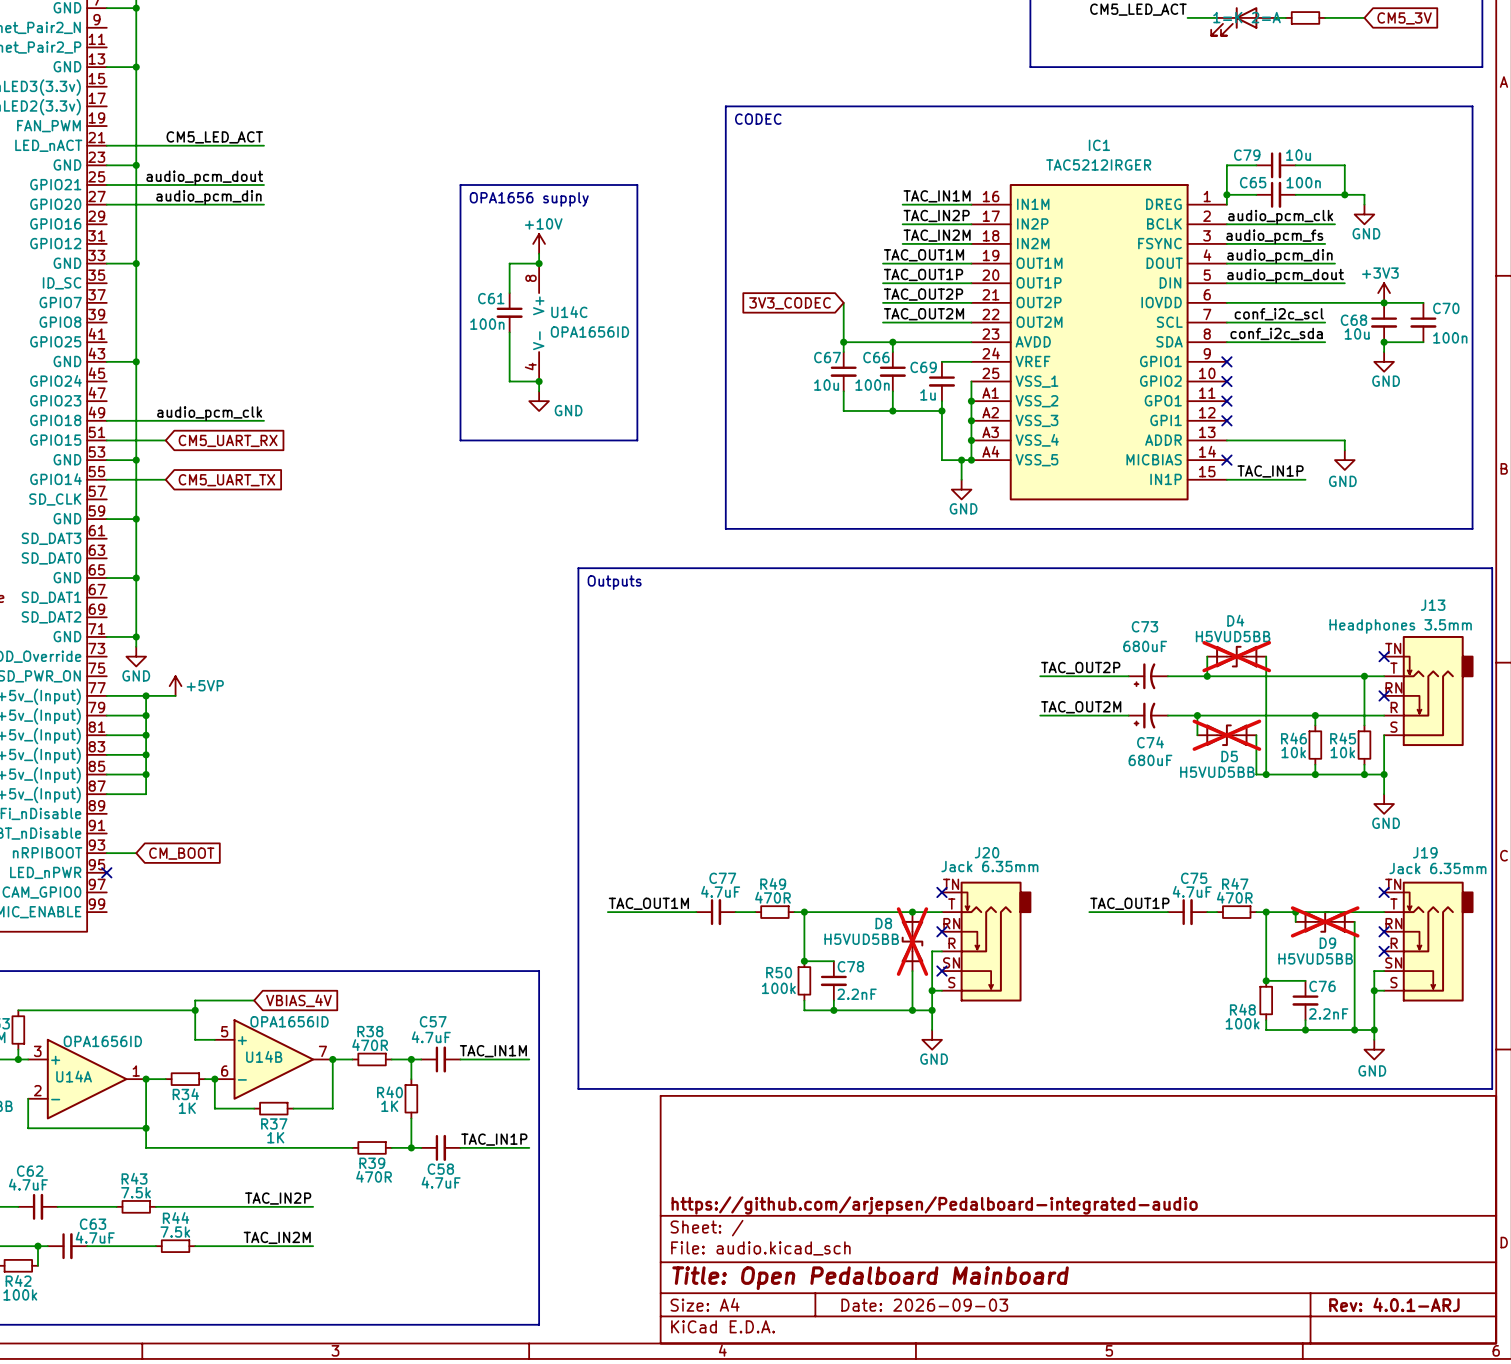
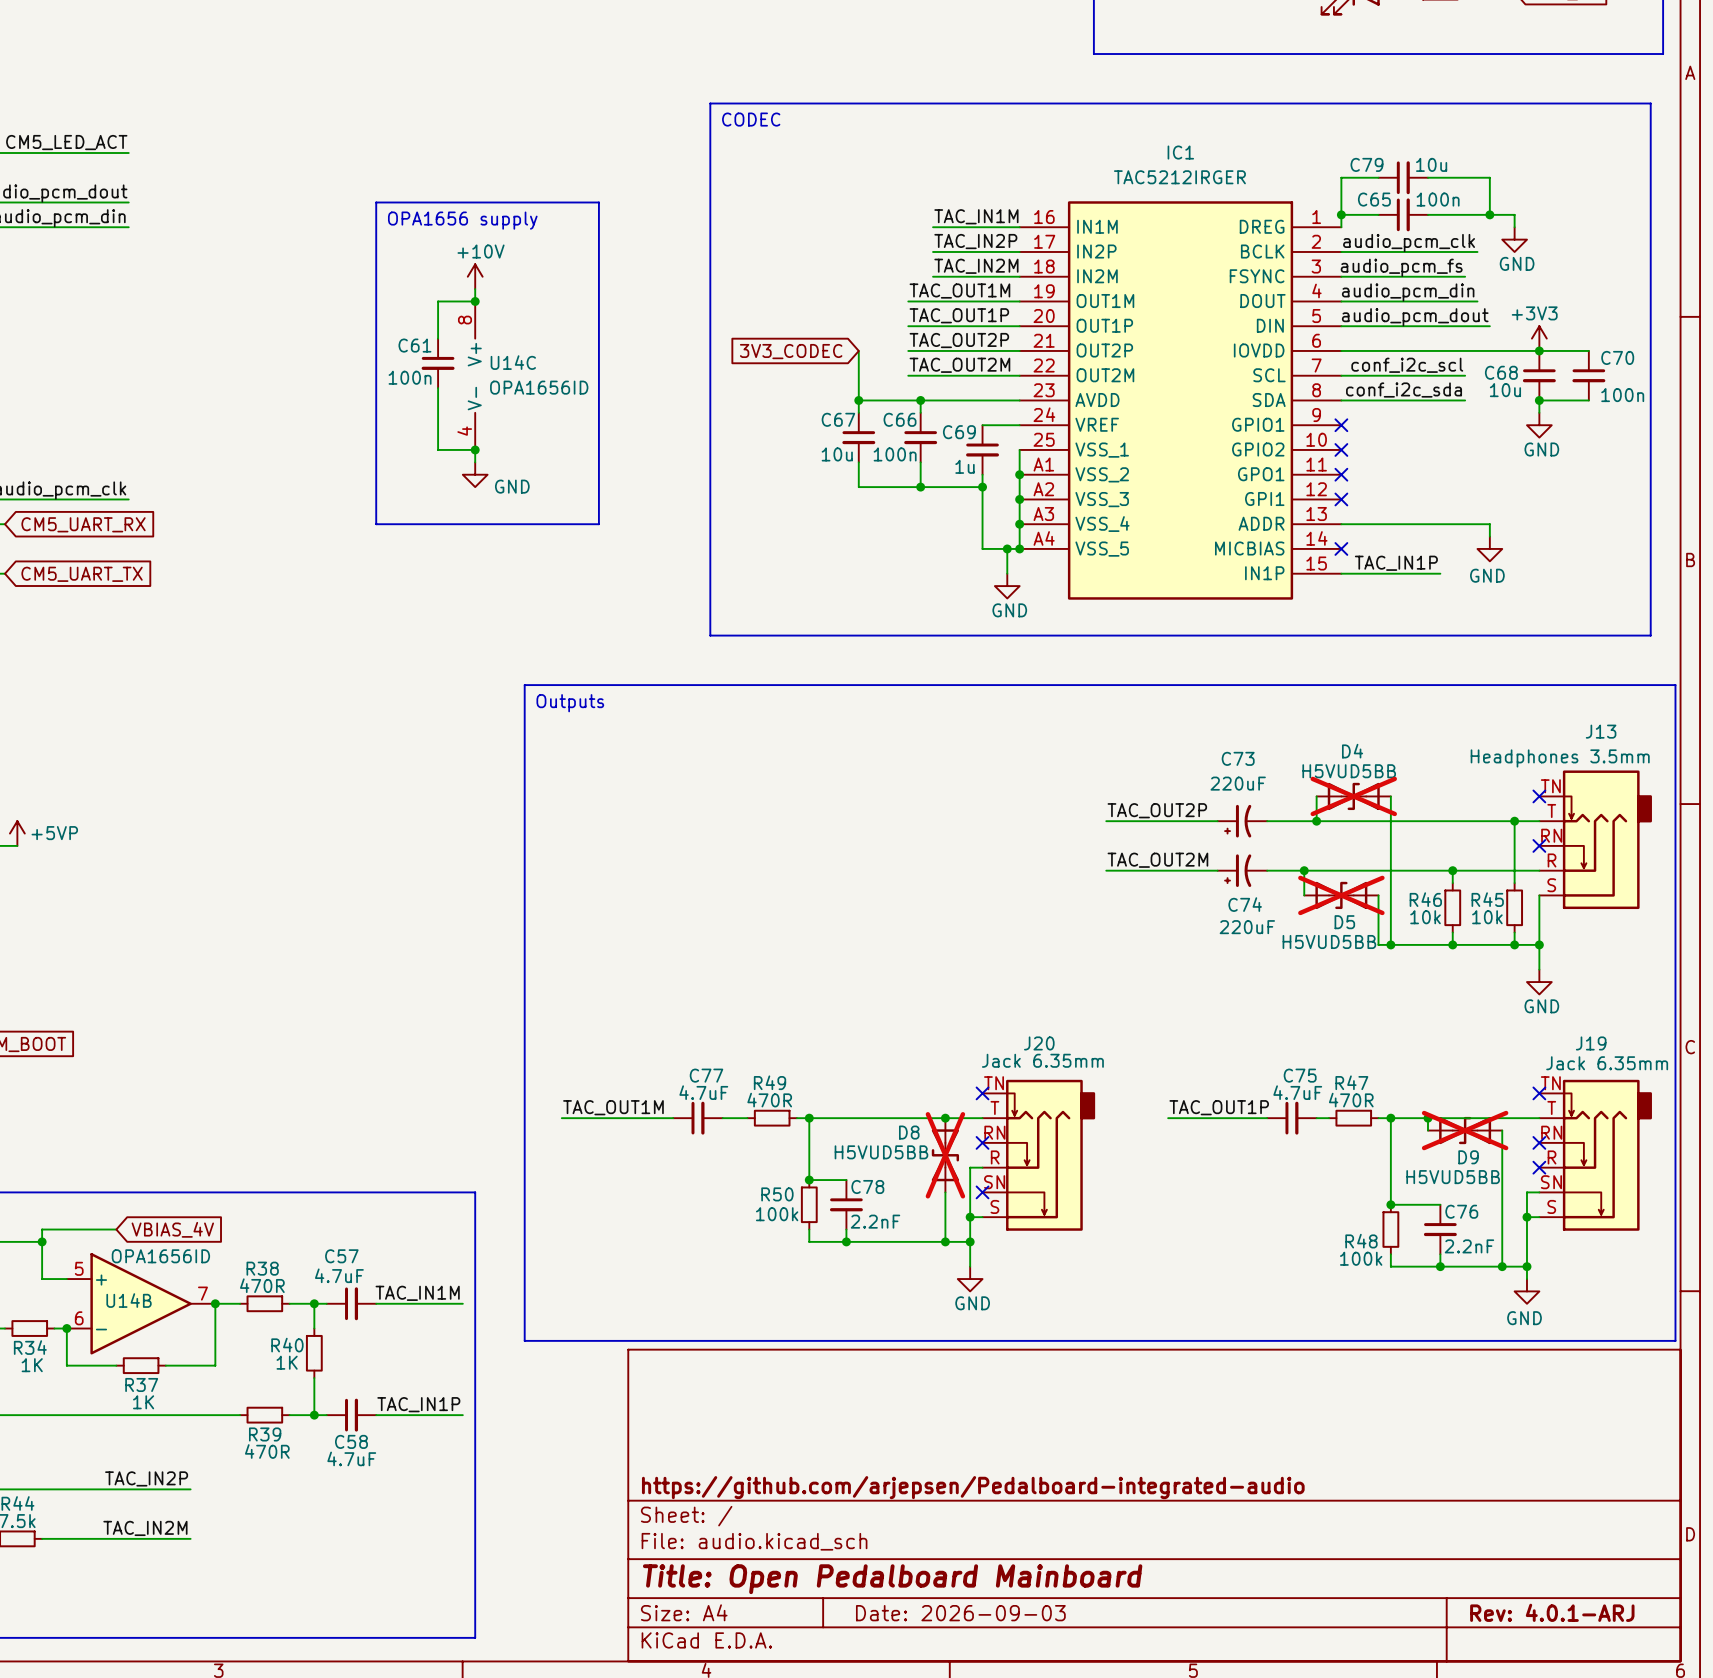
C73 value: 680uF (1145, 646) -> 220uF (1238, 783)
C74 value: 680uF (1150, 760) -> 220uF (1247, 927)

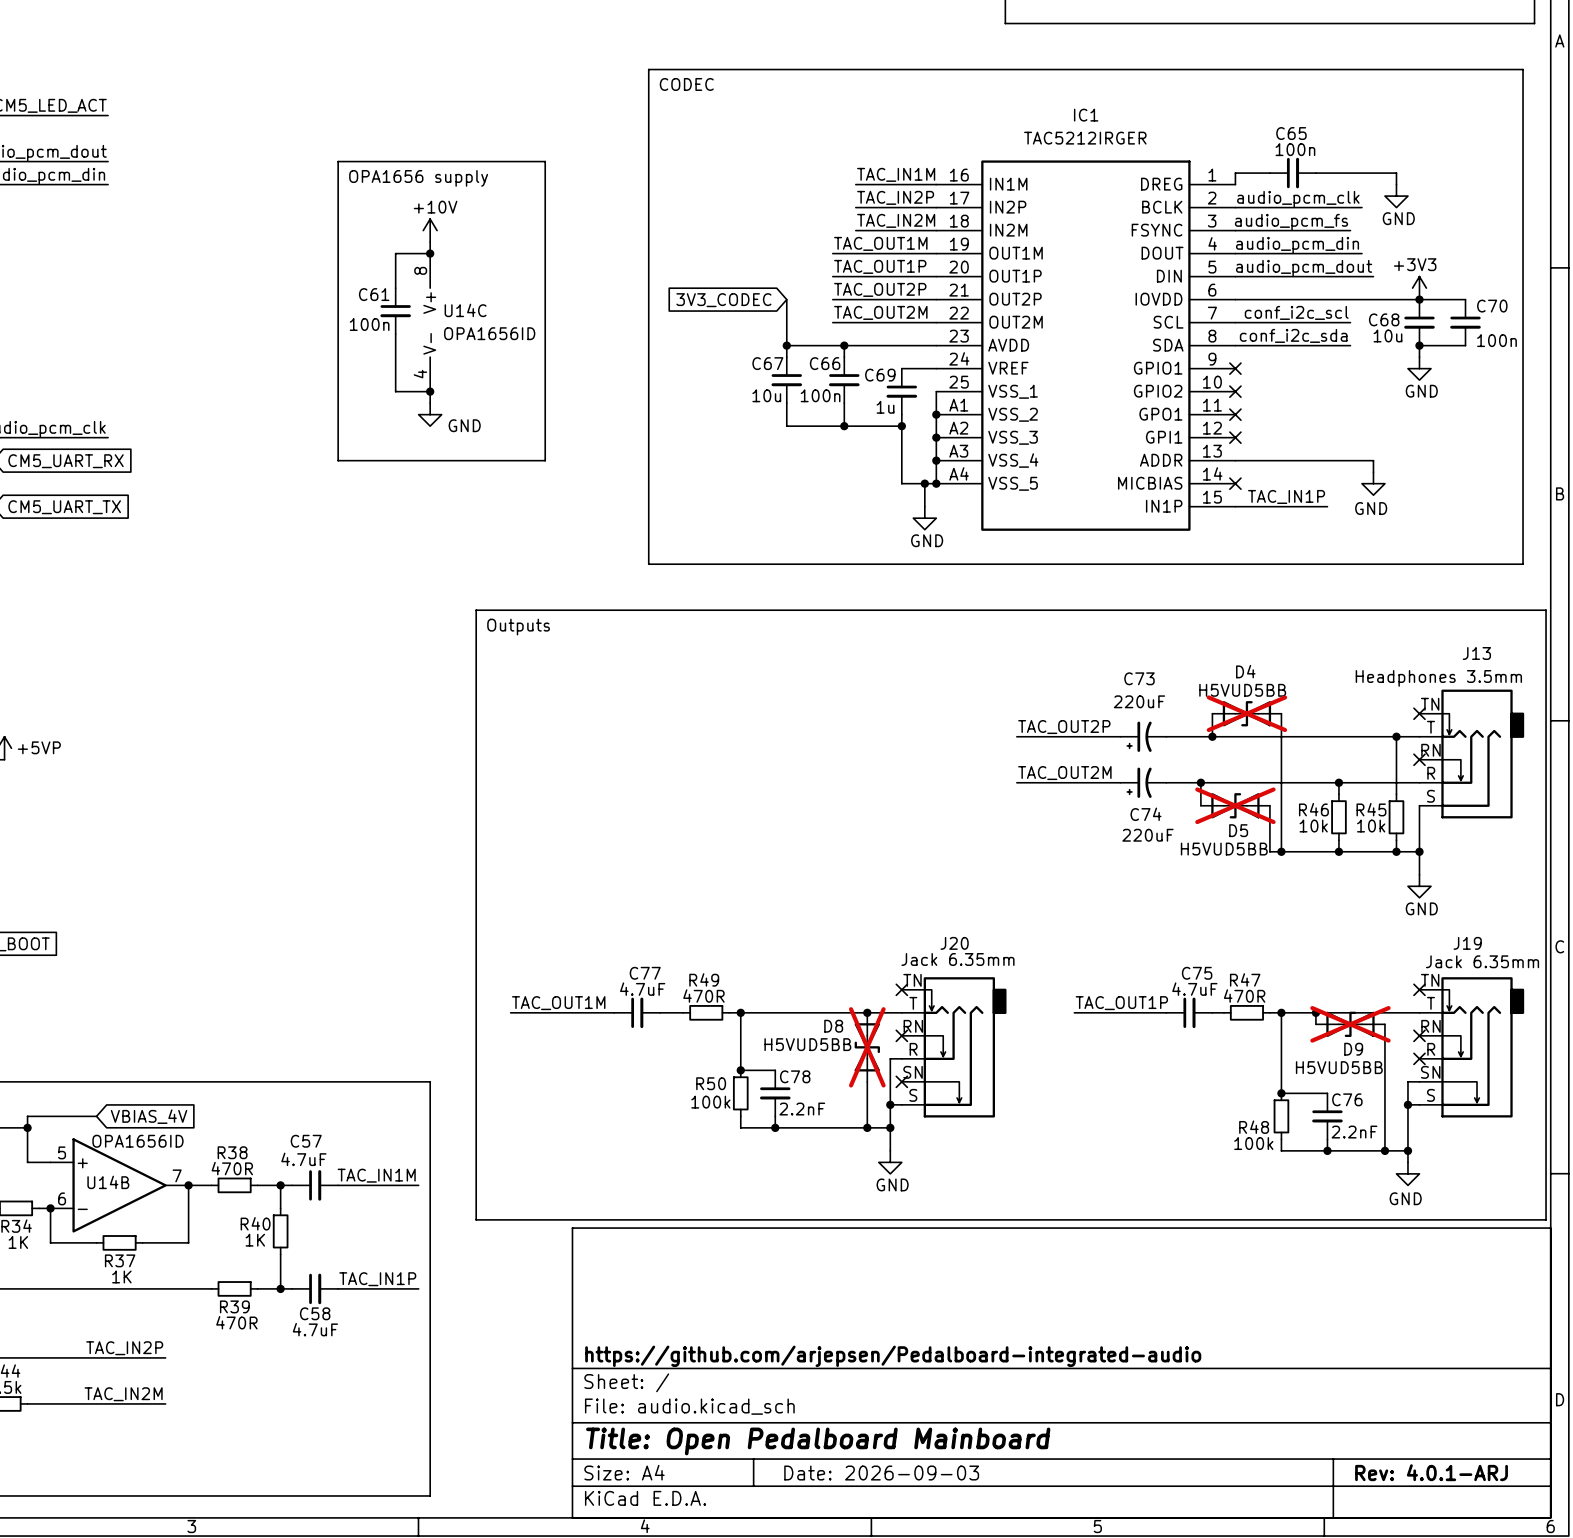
wire: (1378, 177) (1341, 177) (1341, 214) -> none
C79: 10u (1403, 177) -> none
wire: (1428, 177) (1489, 177) (1489, 214) -> none
C65 name position: C65 (1374, 199) -> C65 (1291, 133)
C65 value position: 100n (1438, 199) -> 100n (1295, 149)
junction: (1341, 214) -> none
junction: (1489, 214) -> none

